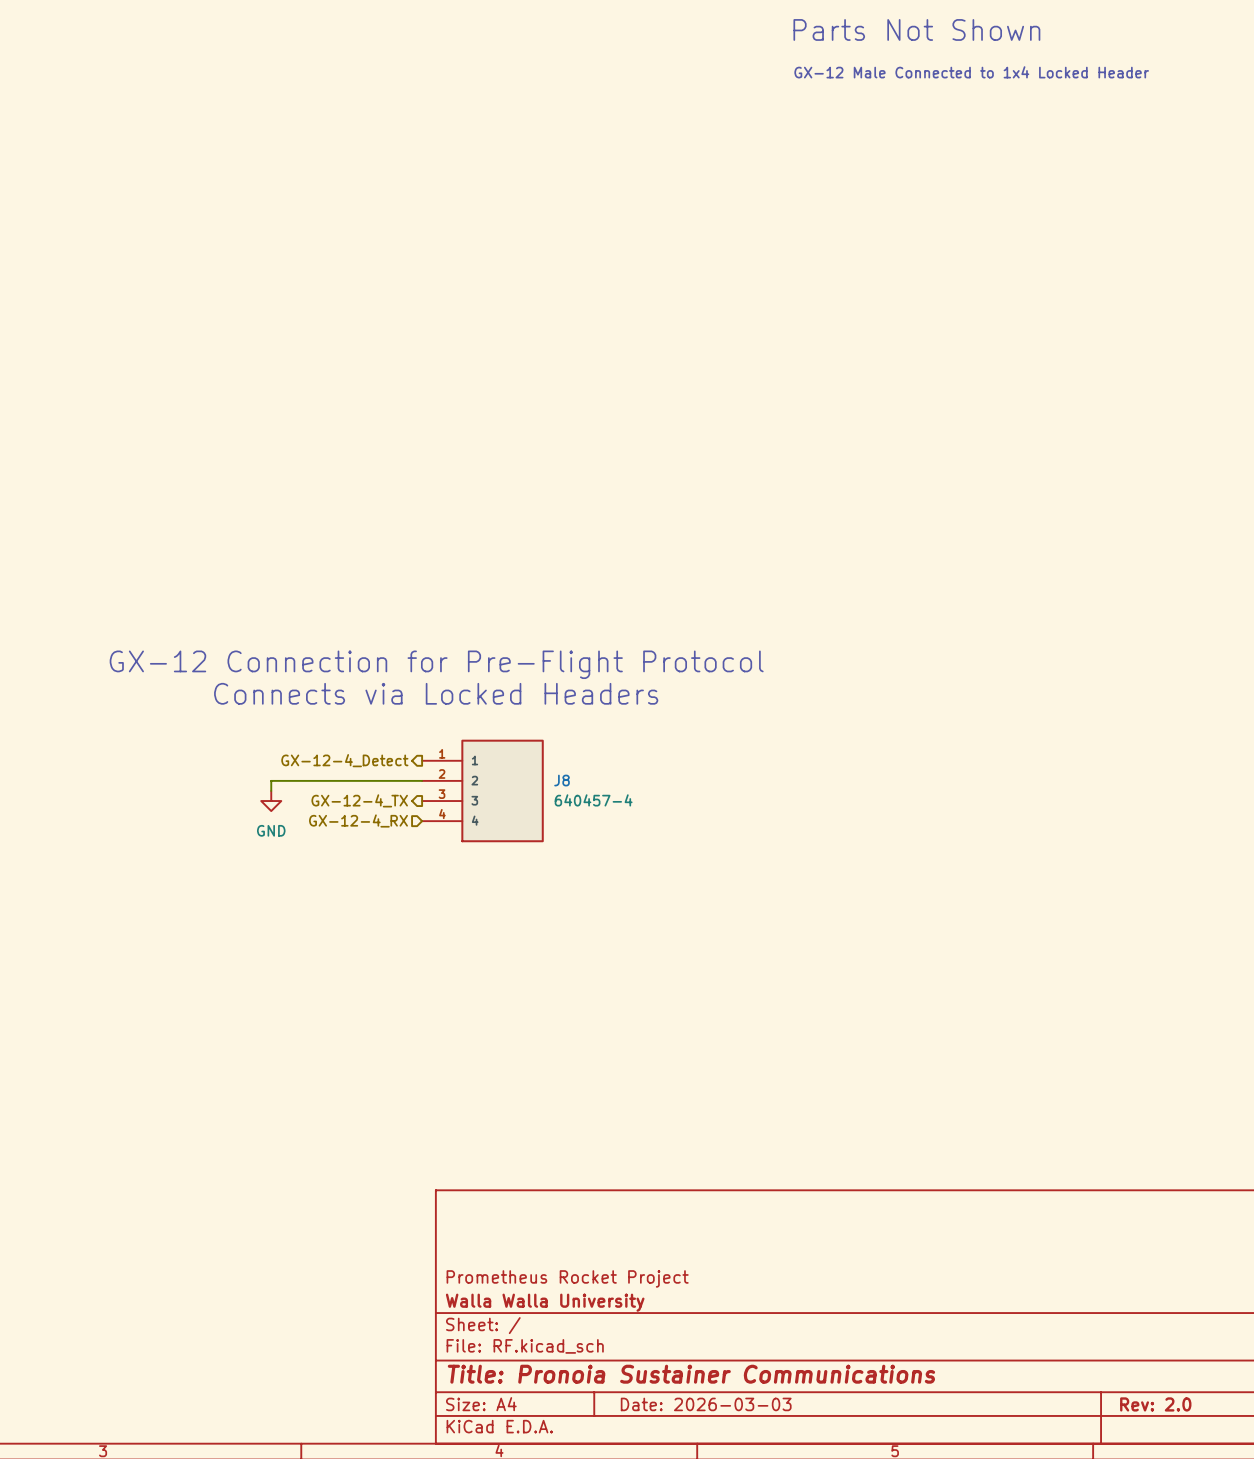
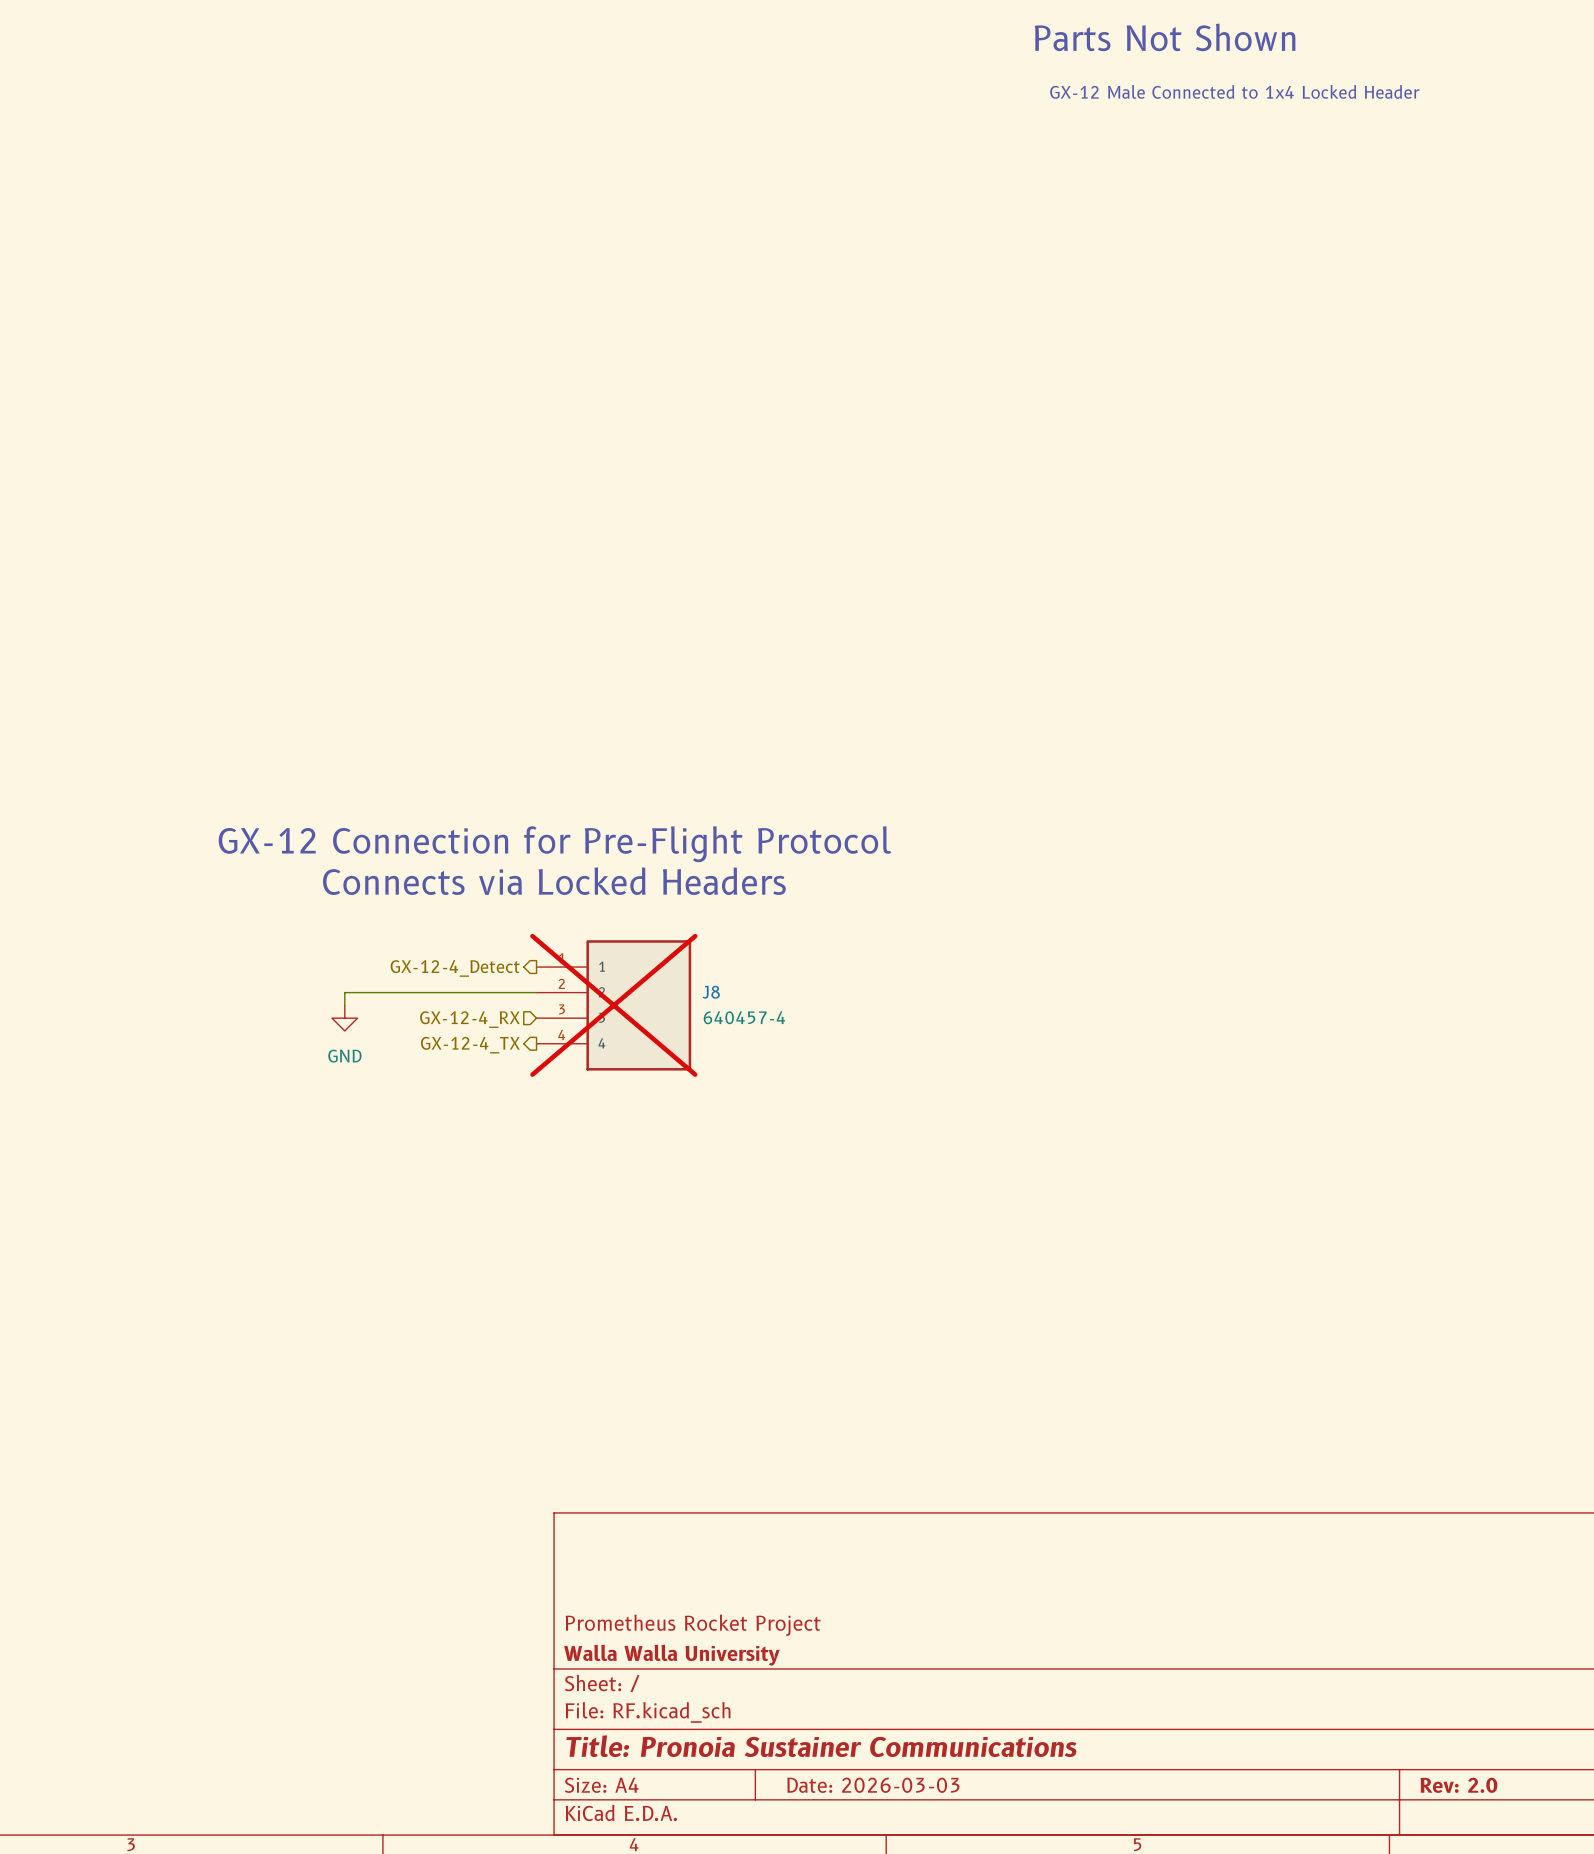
J8 do-not-place cross: none -> (613, 1005)
hierarchical label shape: output (359, 800) -> input (469, 1019)
hierarchical label: GX-12-4_TX (359, 800) -> GX-12-4_RX (469, 1019)
hierarchical label shape: input (358, 820) -> output (470, 1045)
hierarchical label: GX-12-4_RX (358, 820) -> GX-12-4_TX (470, 1045)

